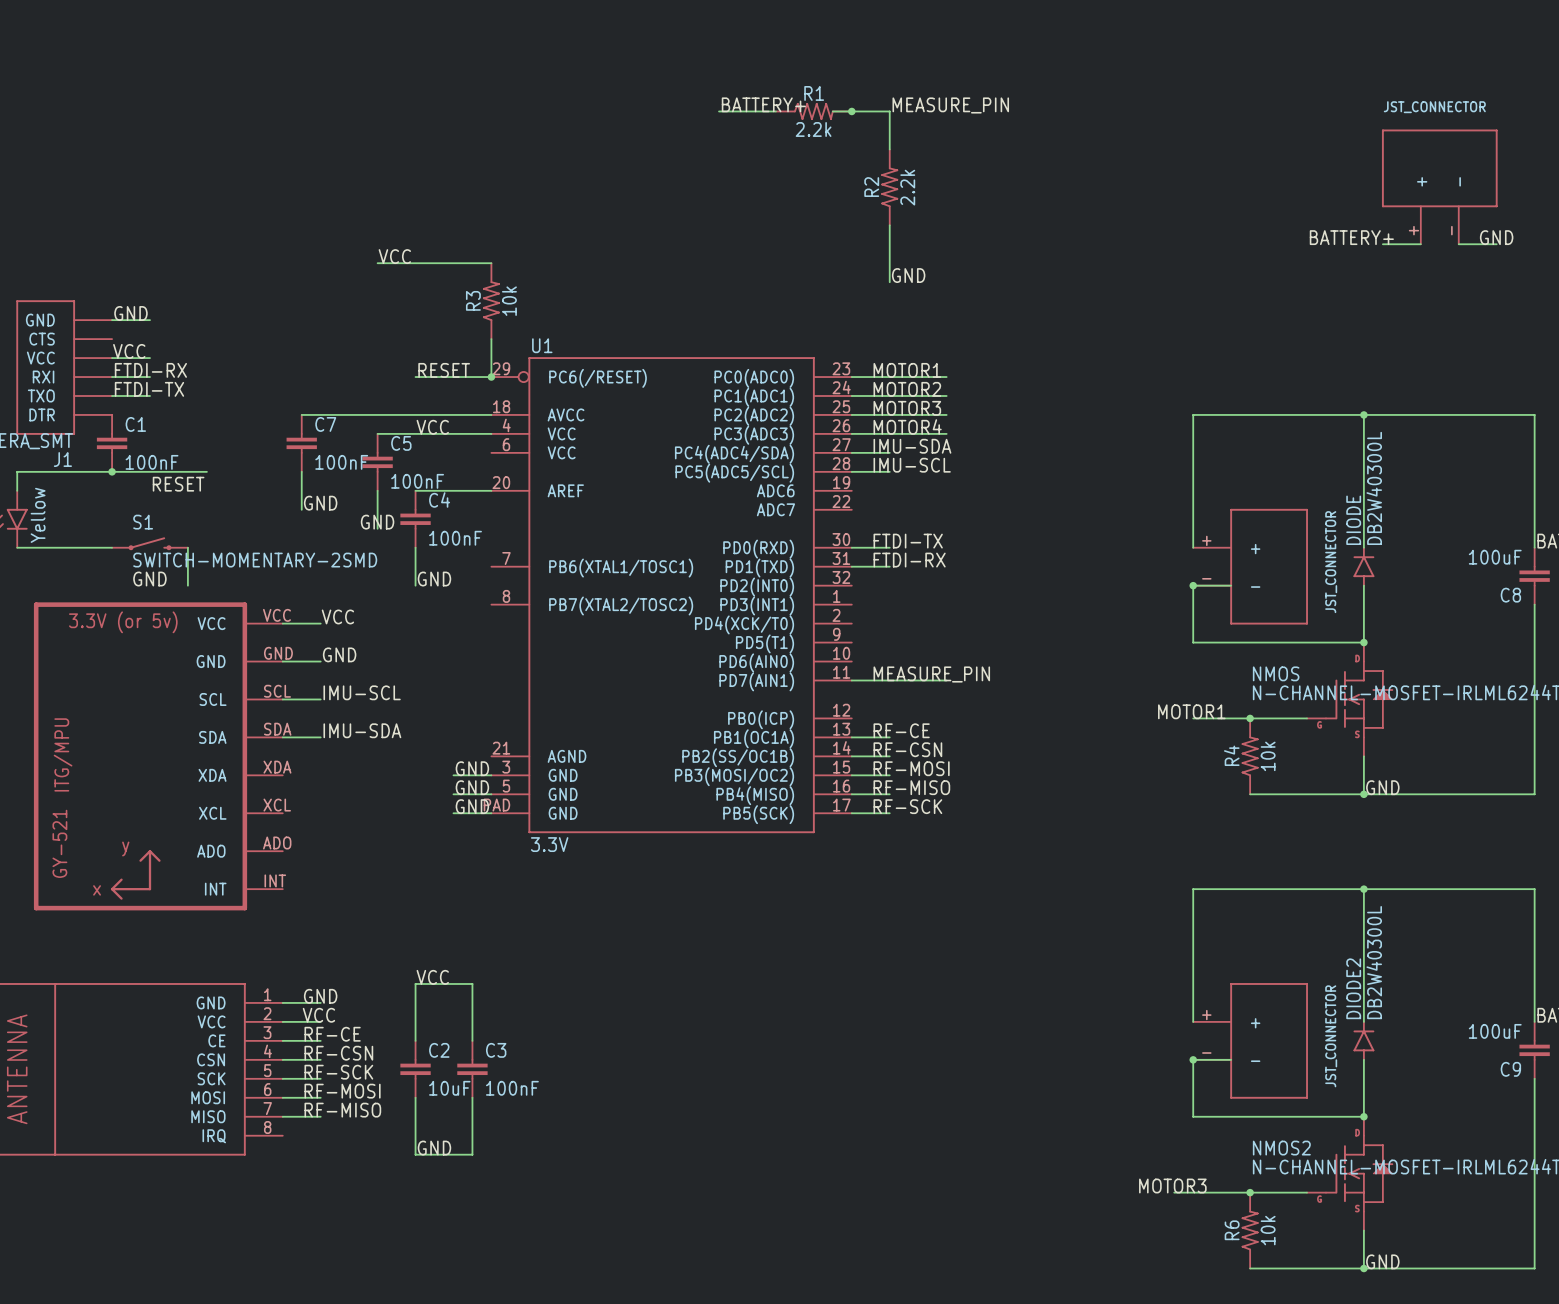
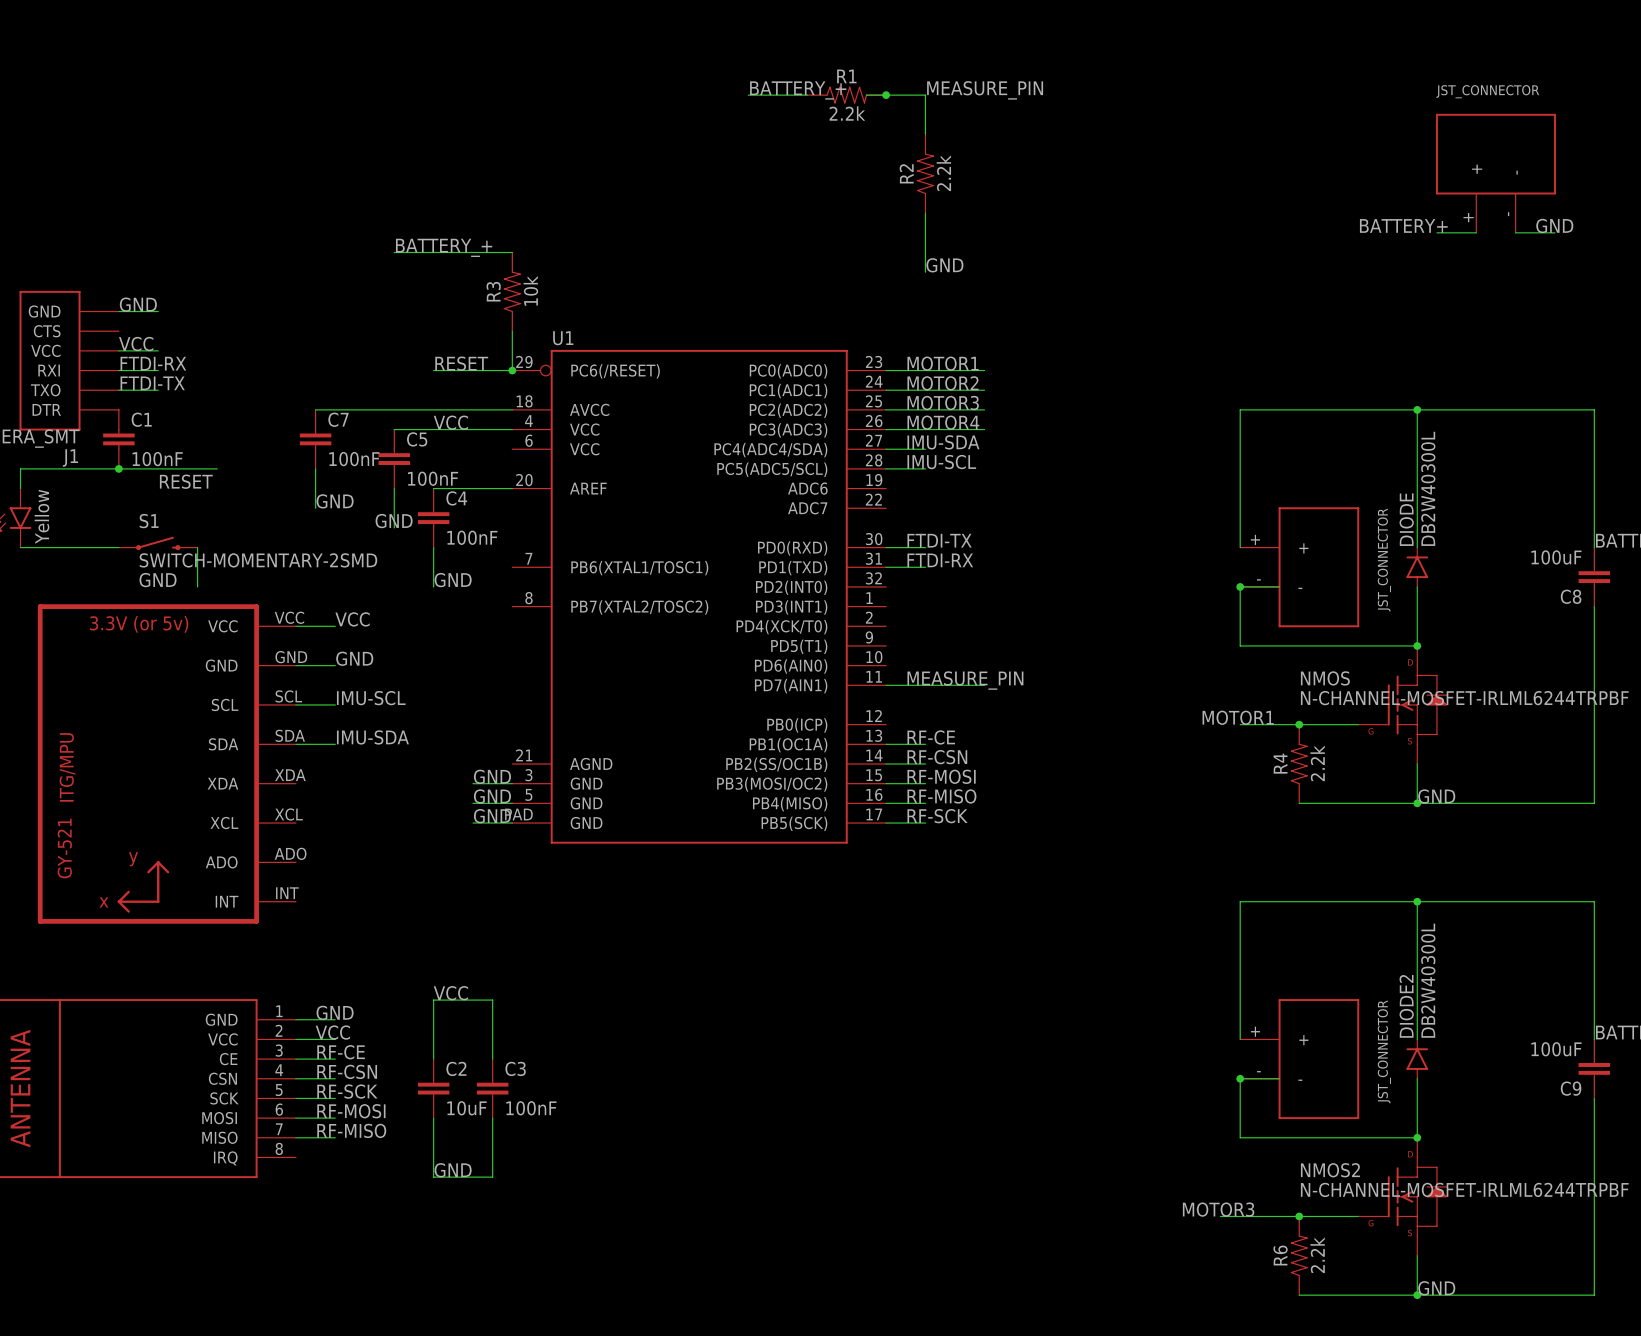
label: BATTERY+ (763, 104) -> BATTERY_+ (798, 90)
label: VCC (394, 256) -> BATTERY_+ (444, 247)
R4 value: 10k (1268, 756) -> 2.2k (1317, 763)
U1 value: 3.3V (549, 844) -> none
R6 value: 10k (1268, 1230) -> 2.2k (1317, 1255)

